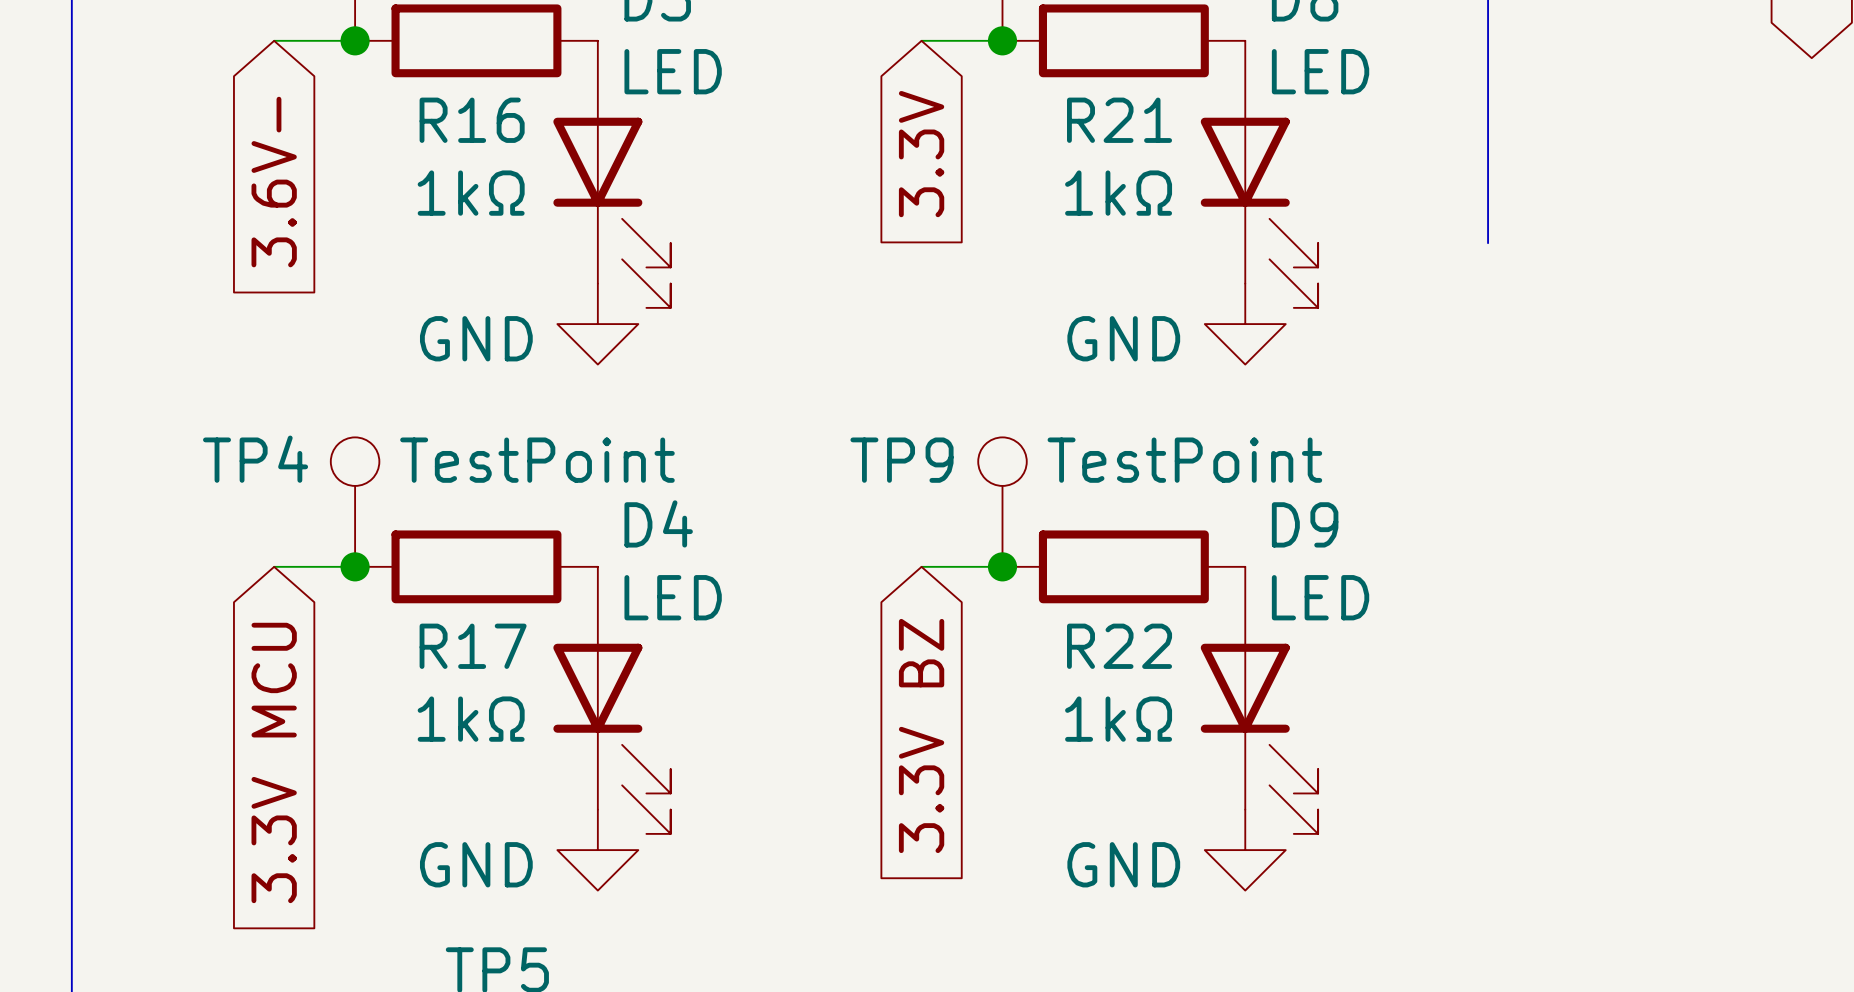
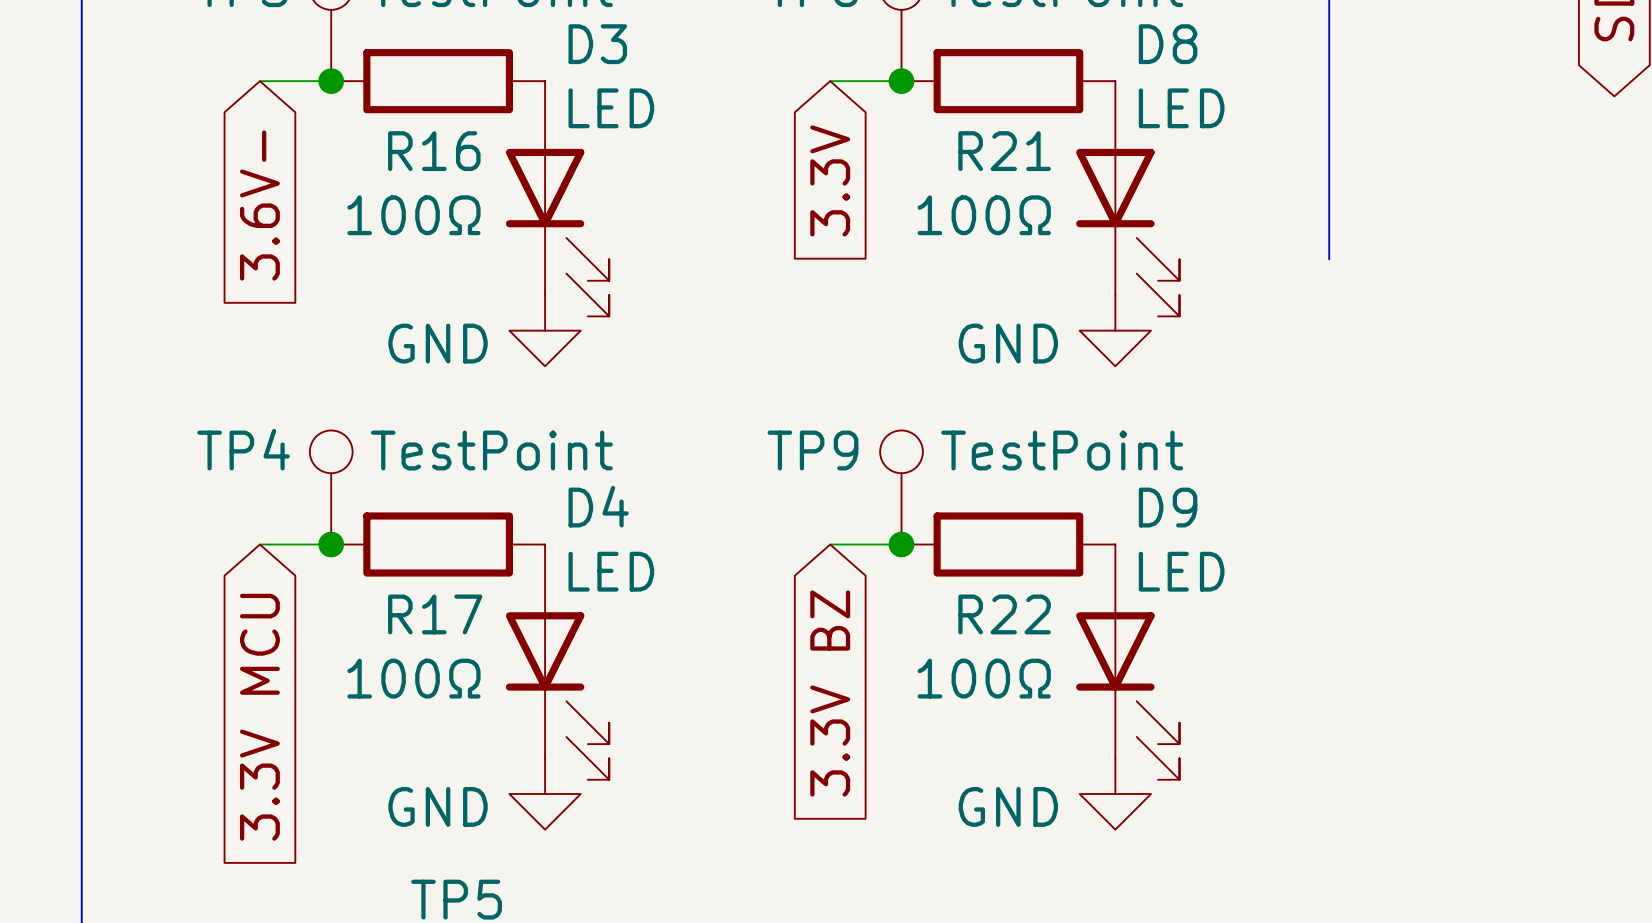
R16 value: 1kΩ (471, 193) -> 100Ω (413, 215)
R21 value: 1kΩ (1118, 193) -> 100Ω (984, 215)
R17 value: 1kΩ (471, 719) -> 100Ω (413, 678)
R22 value: 1kΩ (1118, 719) -> 100Ω (984, 678)

